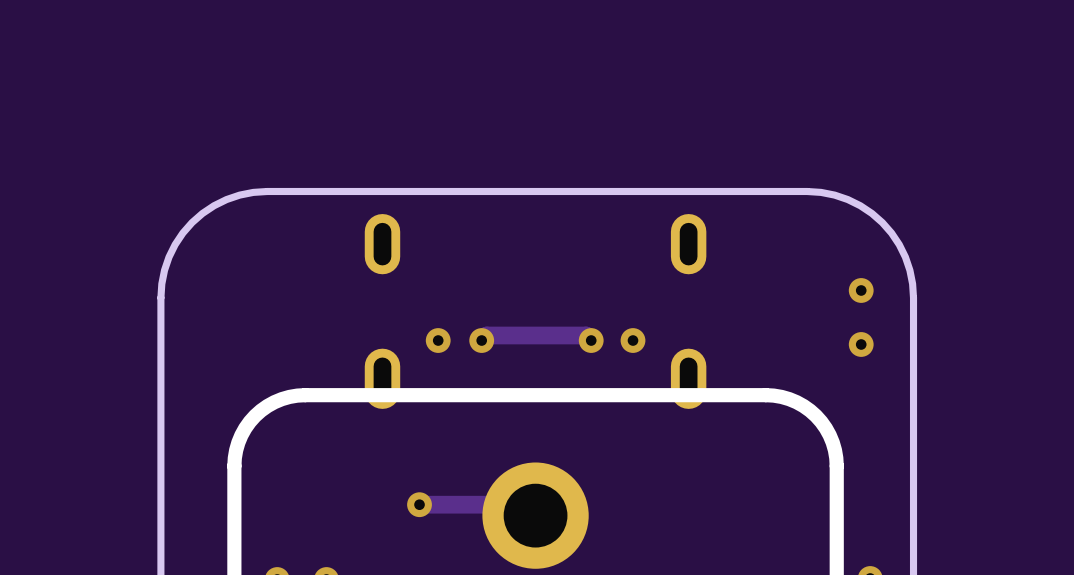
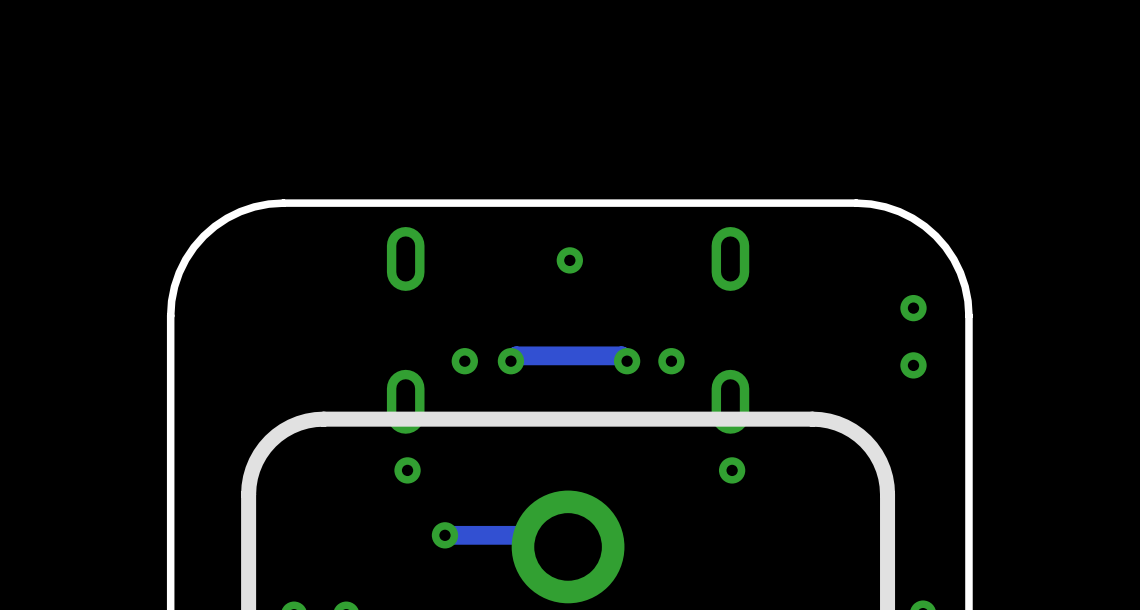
via: none -> (569, 260)
via: none -> (407, 470)
via: none -> (732, 470)

